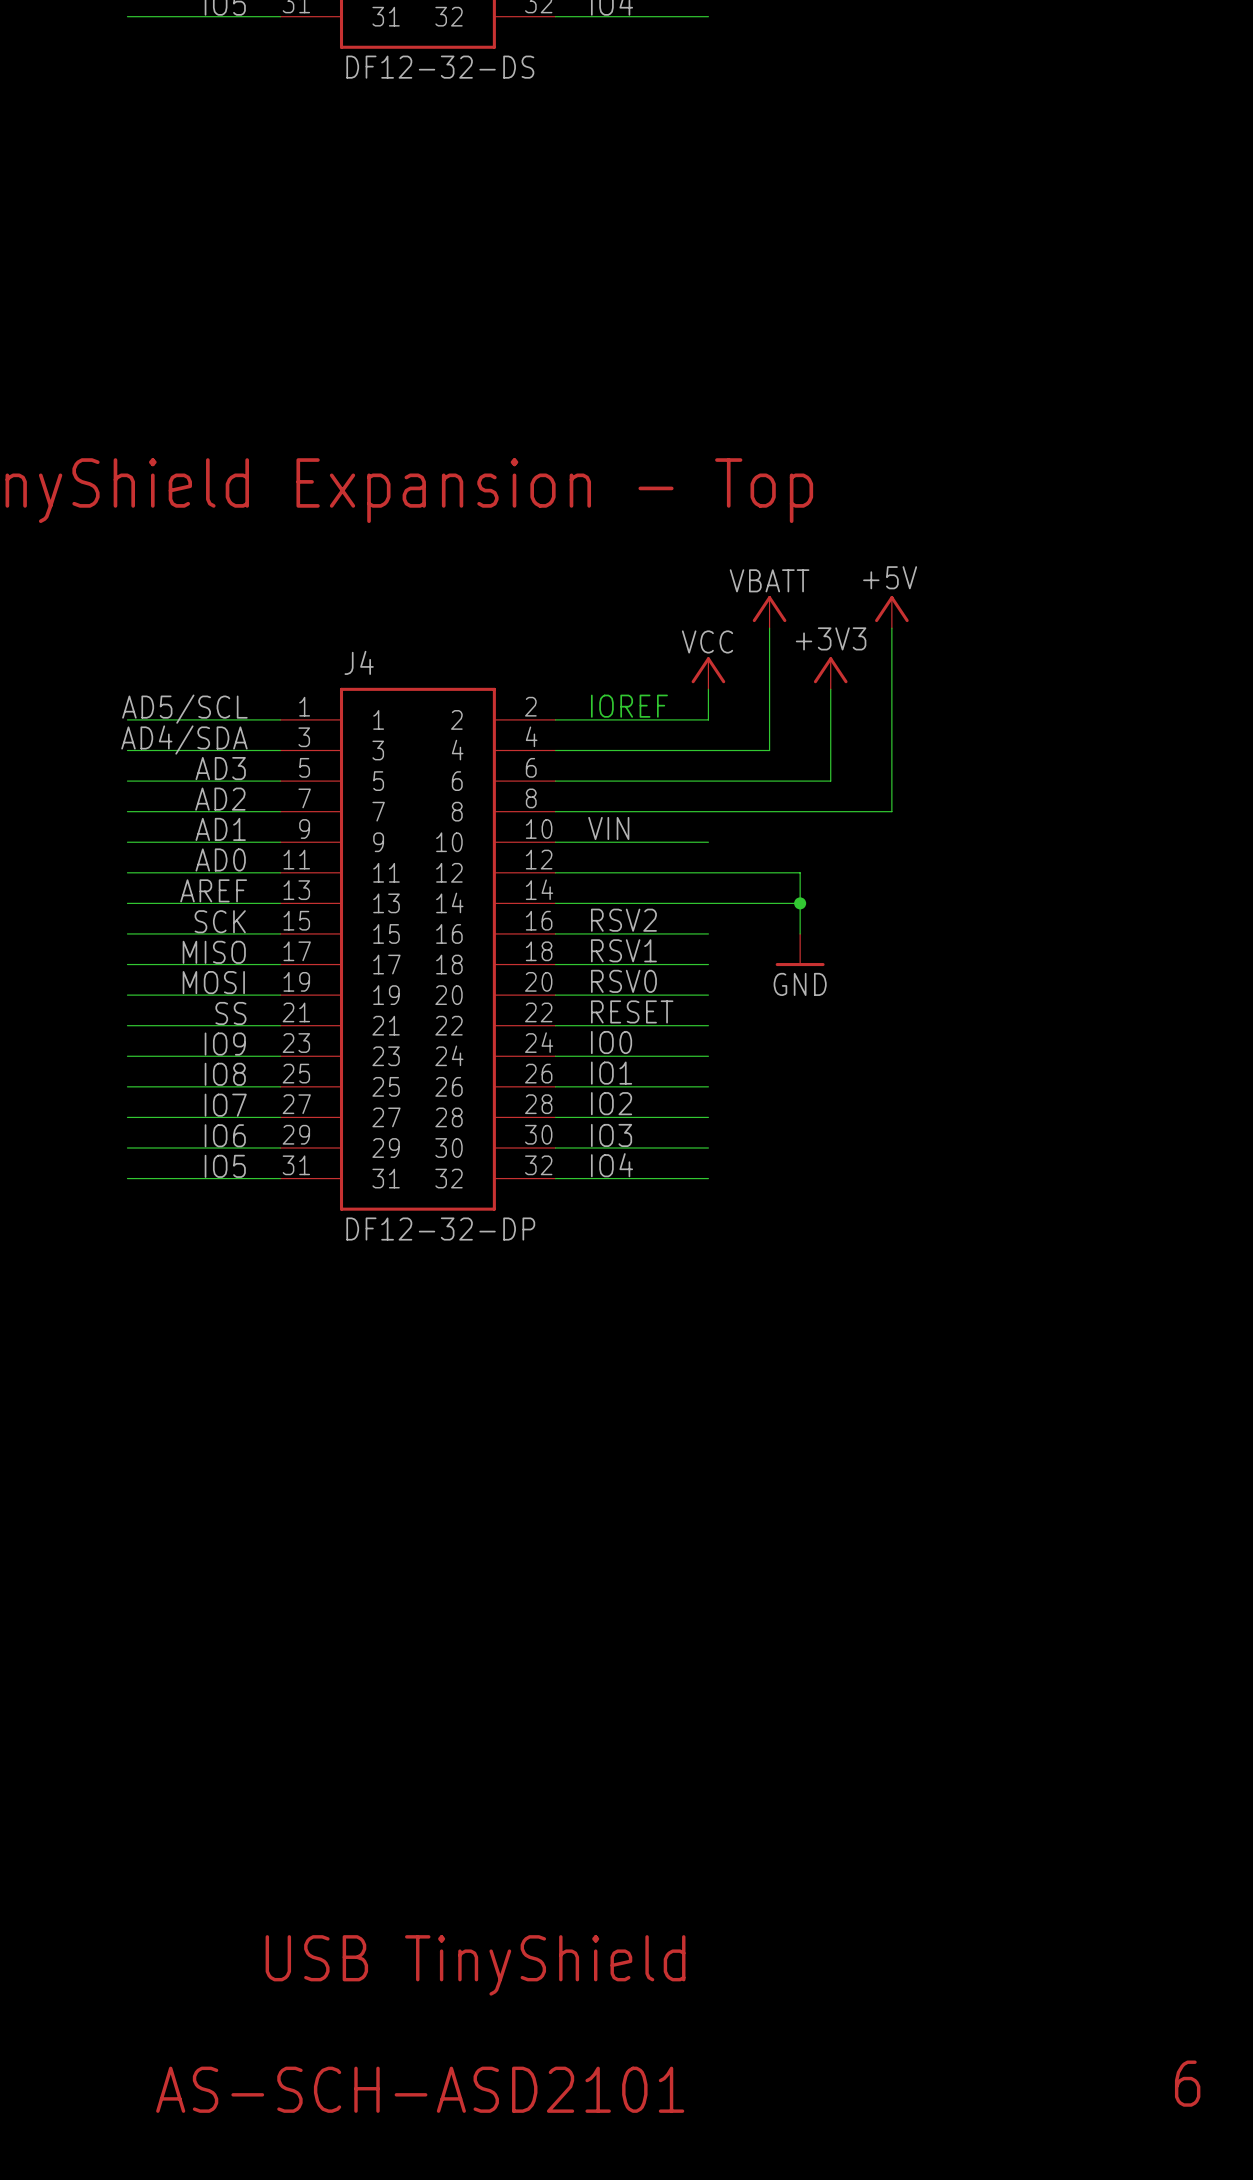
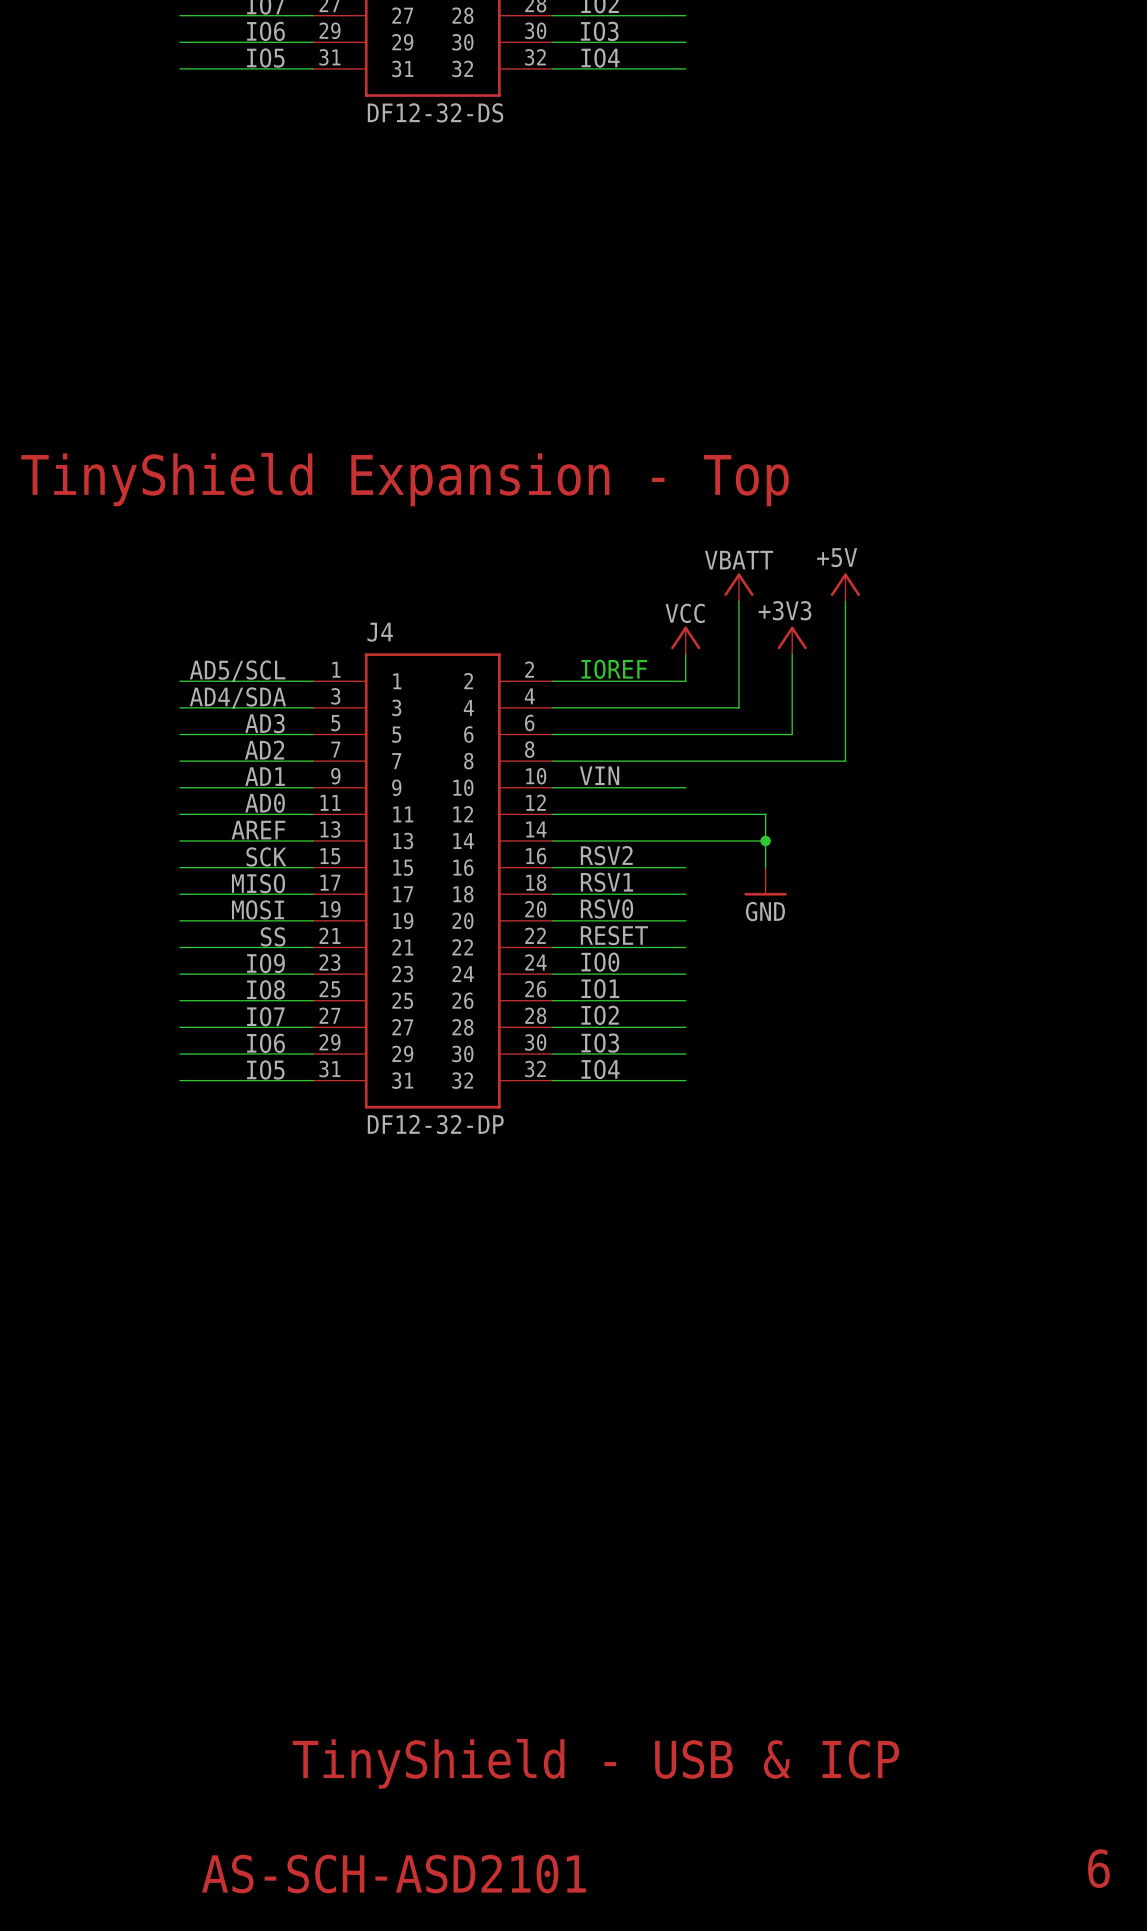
text: USB TinyShield (475, 1965) -> TinyShield - USB & ICP (595, 1763)

